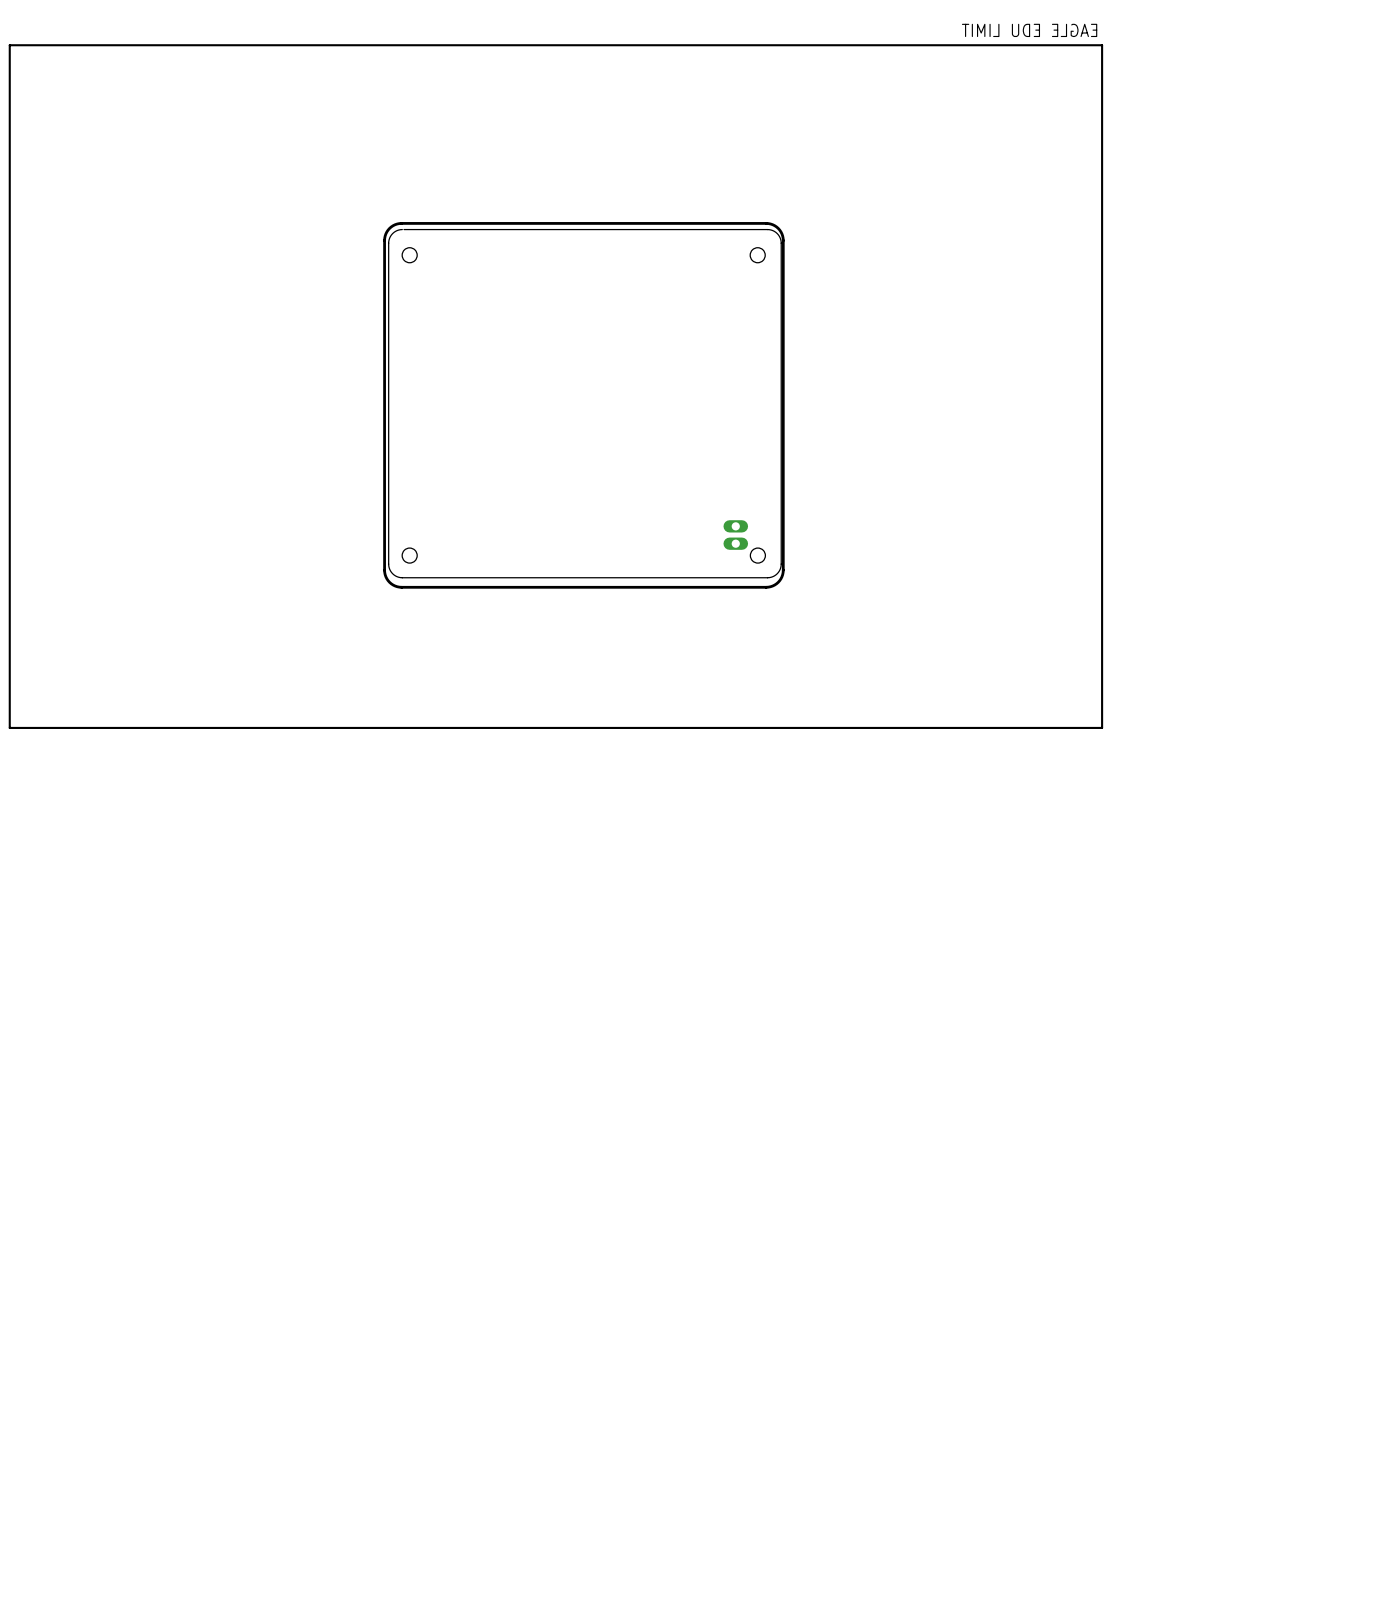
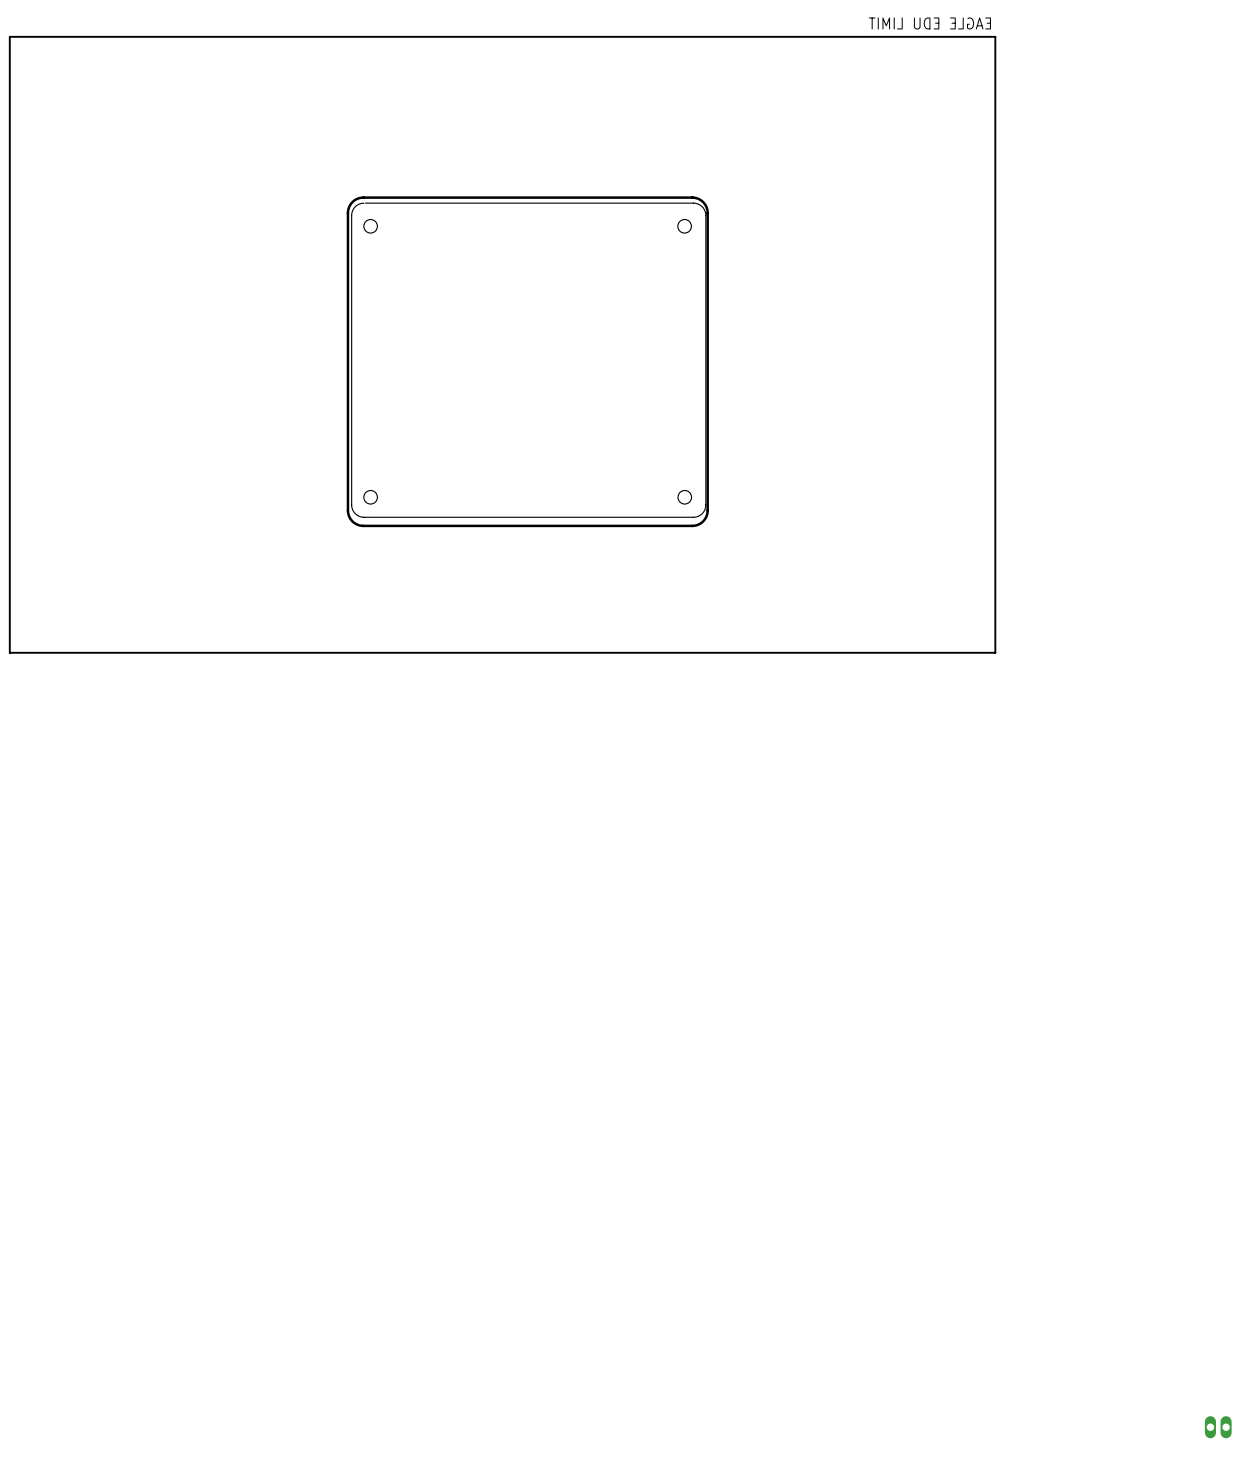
part: (735, 535) -> none
part: none -> (1218, 1427)

